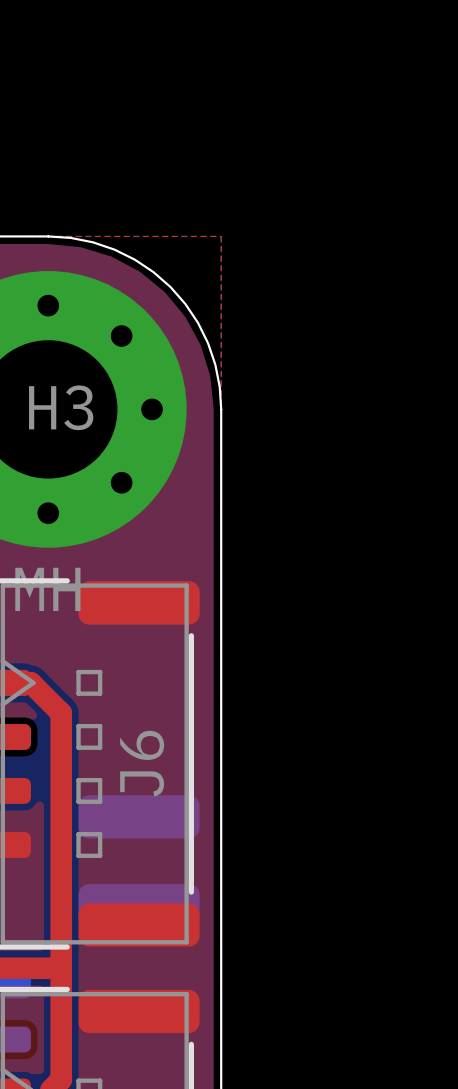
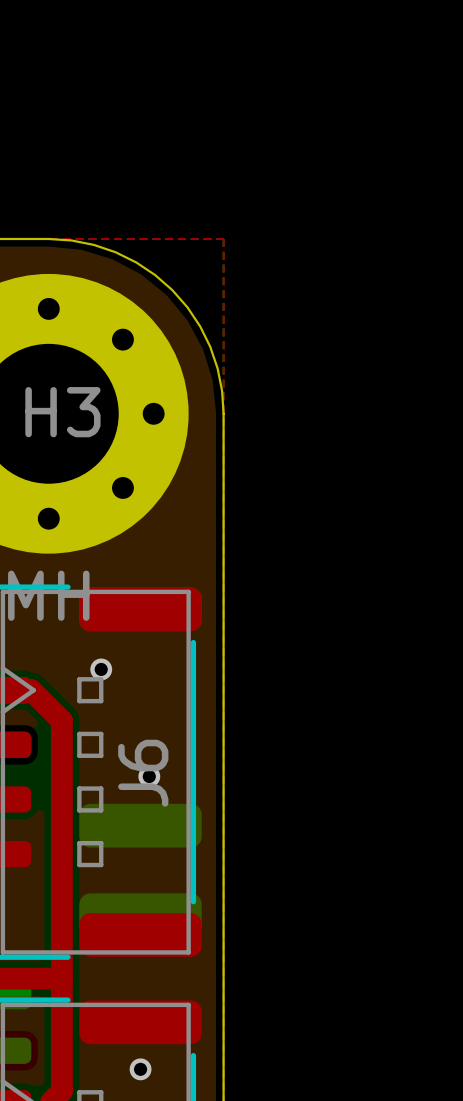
via: none -> (101, 669)
via: none -> (149, 776)
via: none -> (140, 1069)

